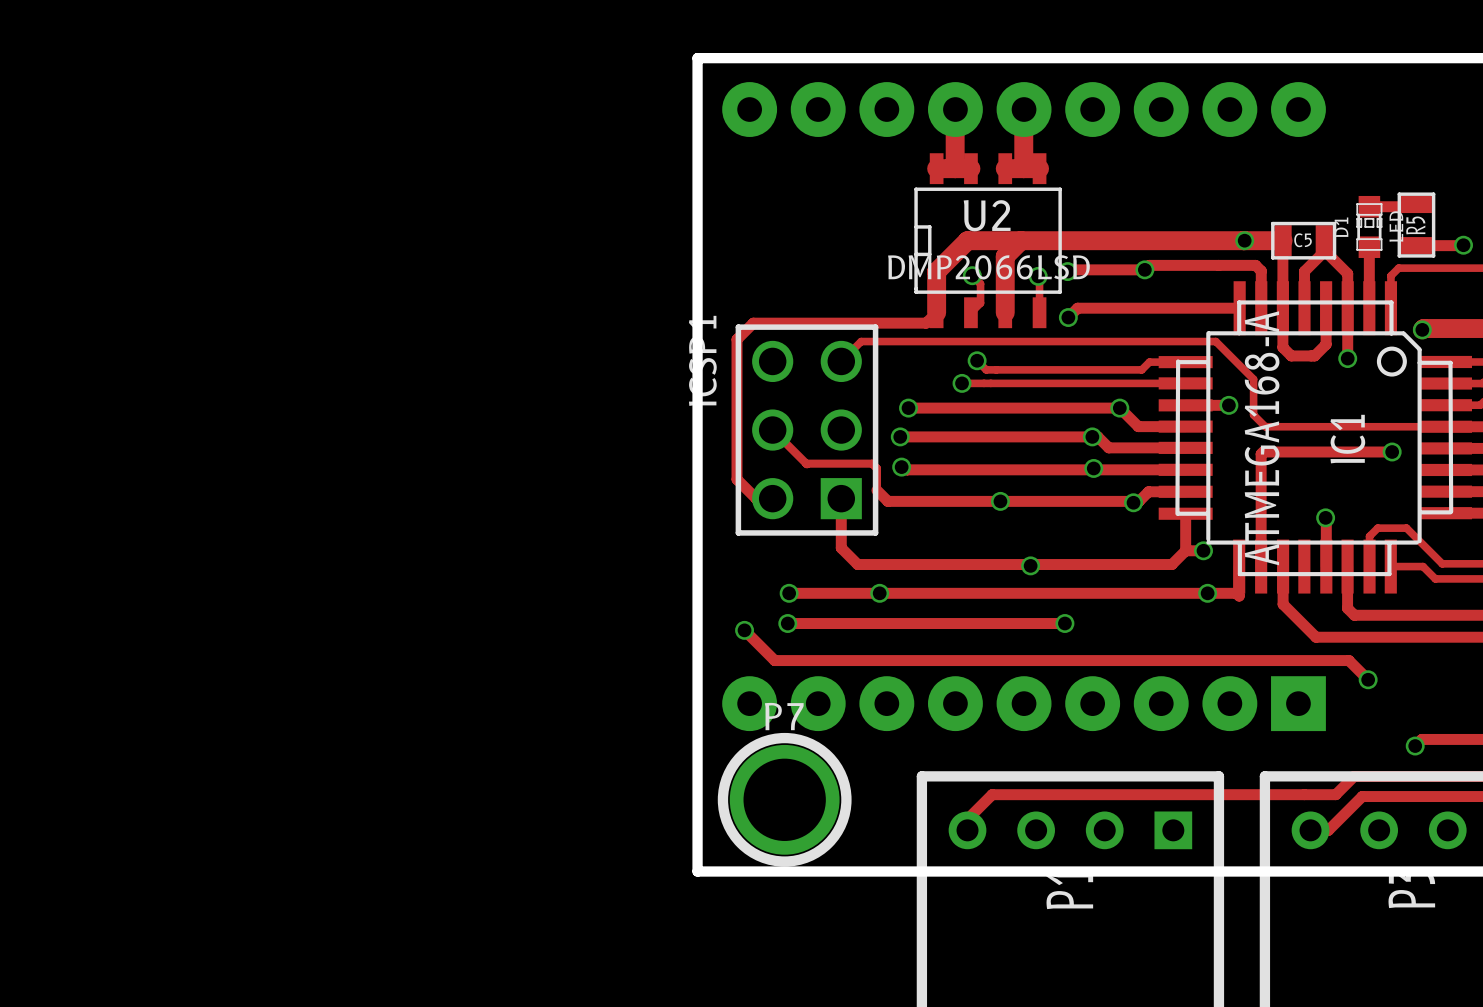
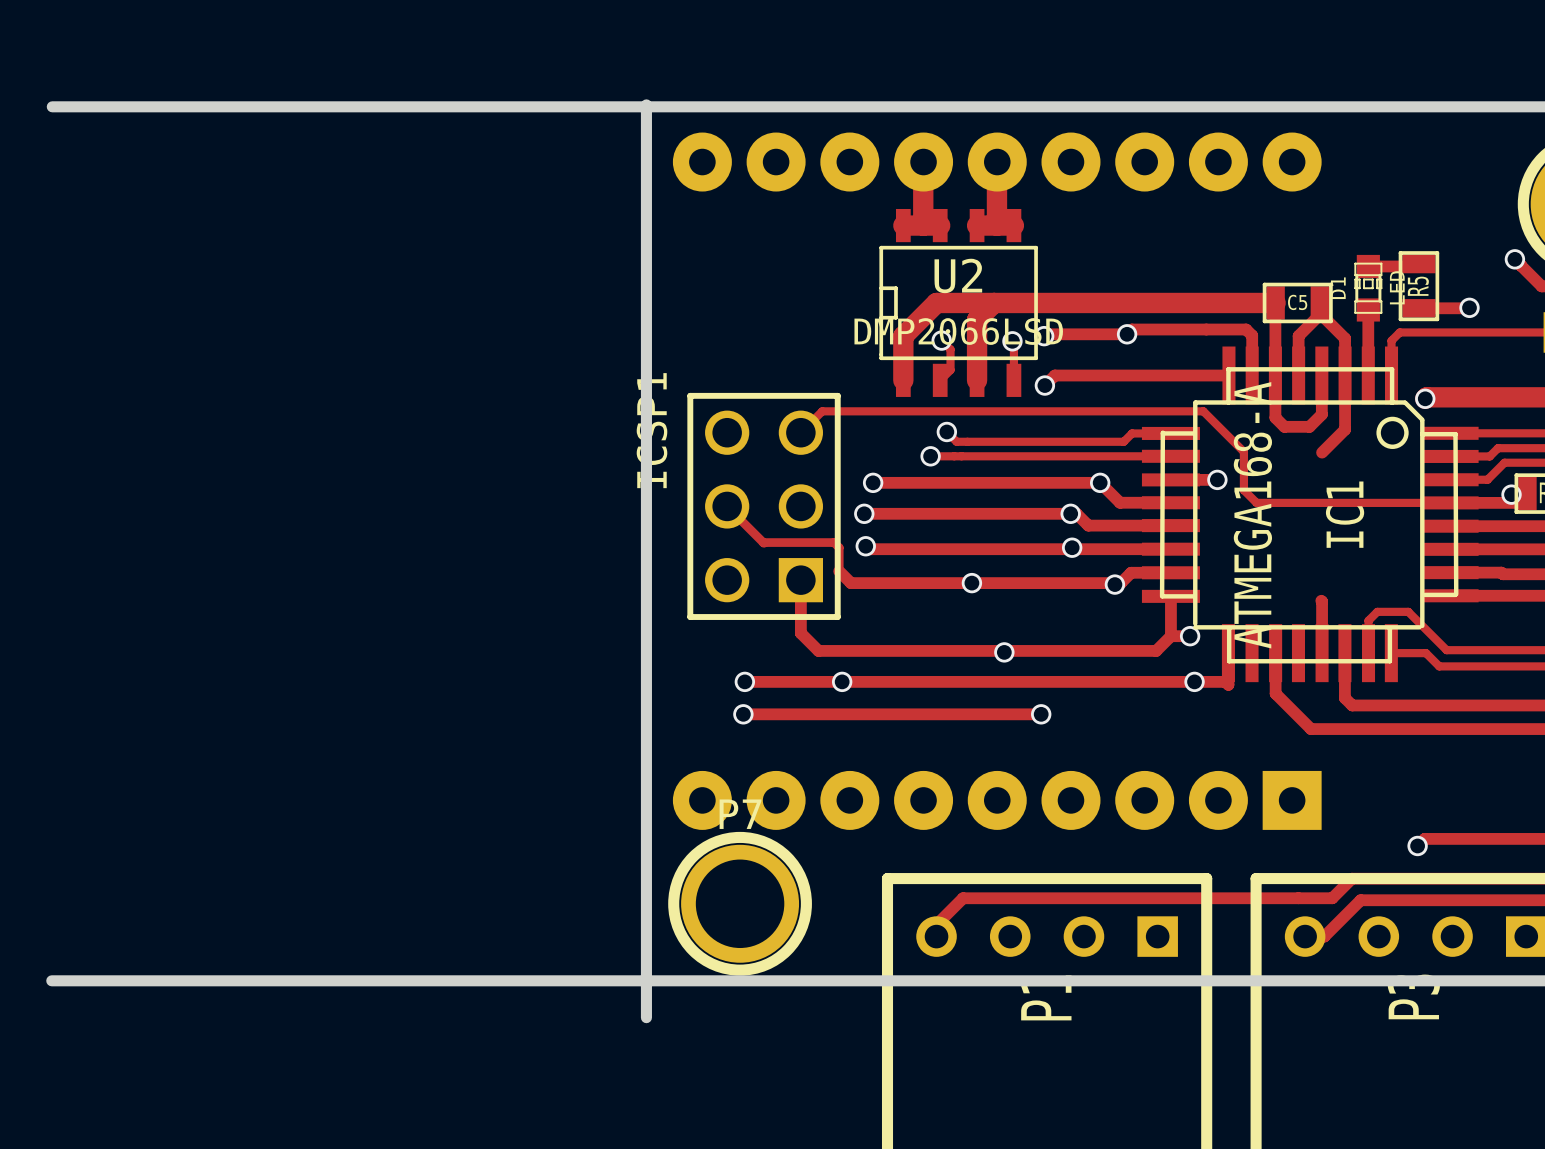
board edge: none -> (646, 104) (646, 106) (52, 106)
via: (1244, 240) -> none
track: (936, 312) (926, 323) (753, 323) (737, 339) (737, 479) (756, 498) (772, 498) -> none
track: none -> (1345, 429) (1322, 452)
via: (1347, 358) -> none
track: (1392, 451) (1263, 451) (1261, 454) (1261, 566) -> none
via: (1392, 451) -> none
via: (1325, 517) -> none
track: (744, 630) (774, 660) (1348, 660) (1368, 679) -> none
via: (744, 630) -> none
via: (1368, 679) -> none
board edge: none -> (51, 980) (646, 980) (646, 1017)

